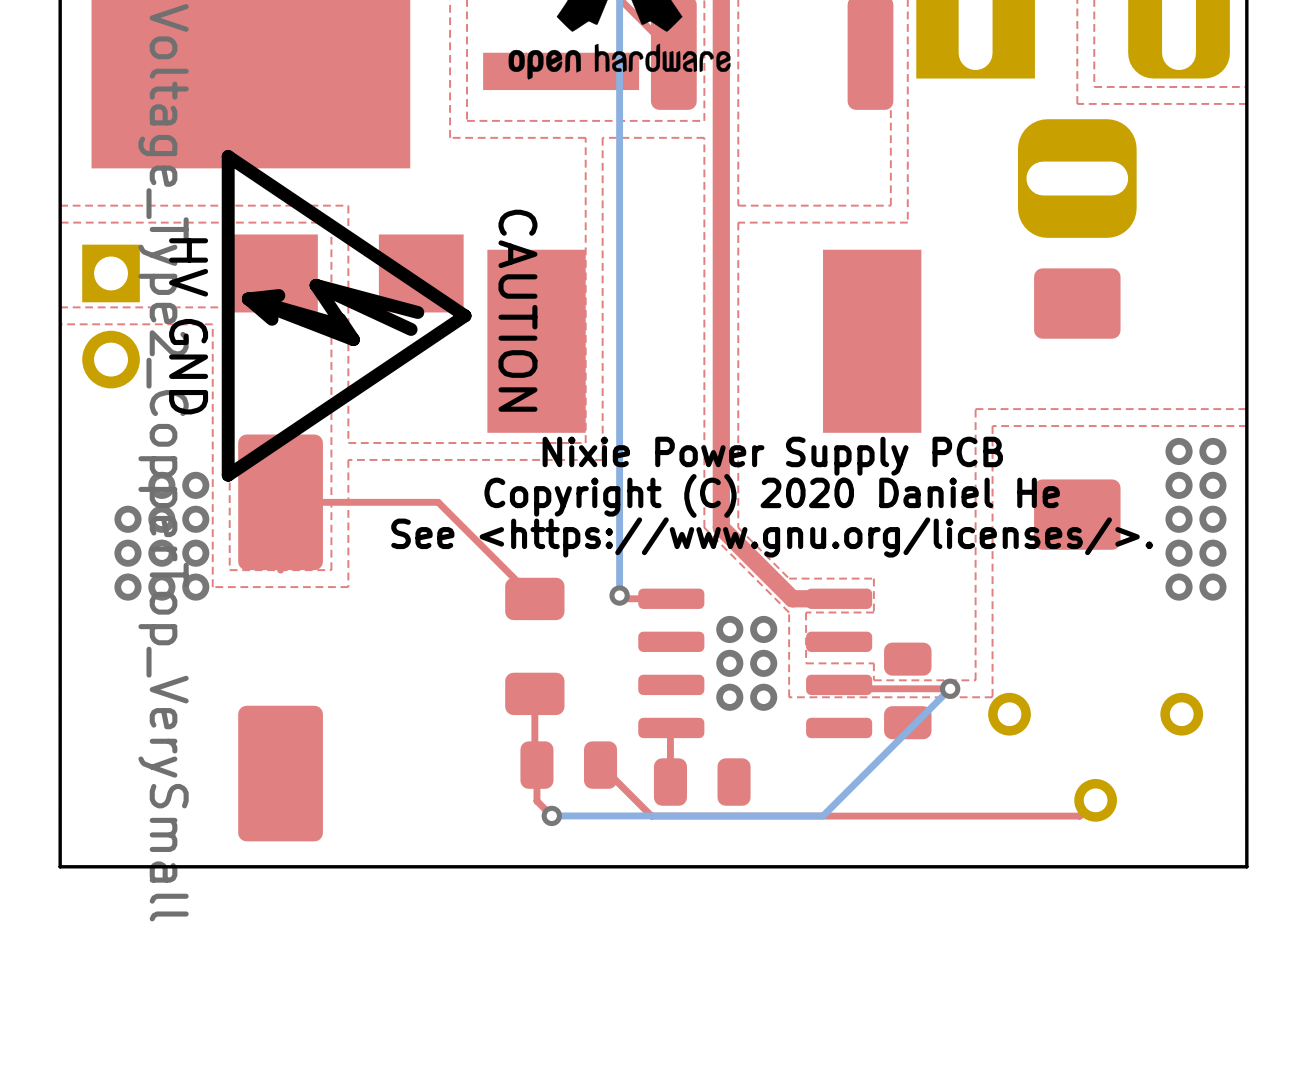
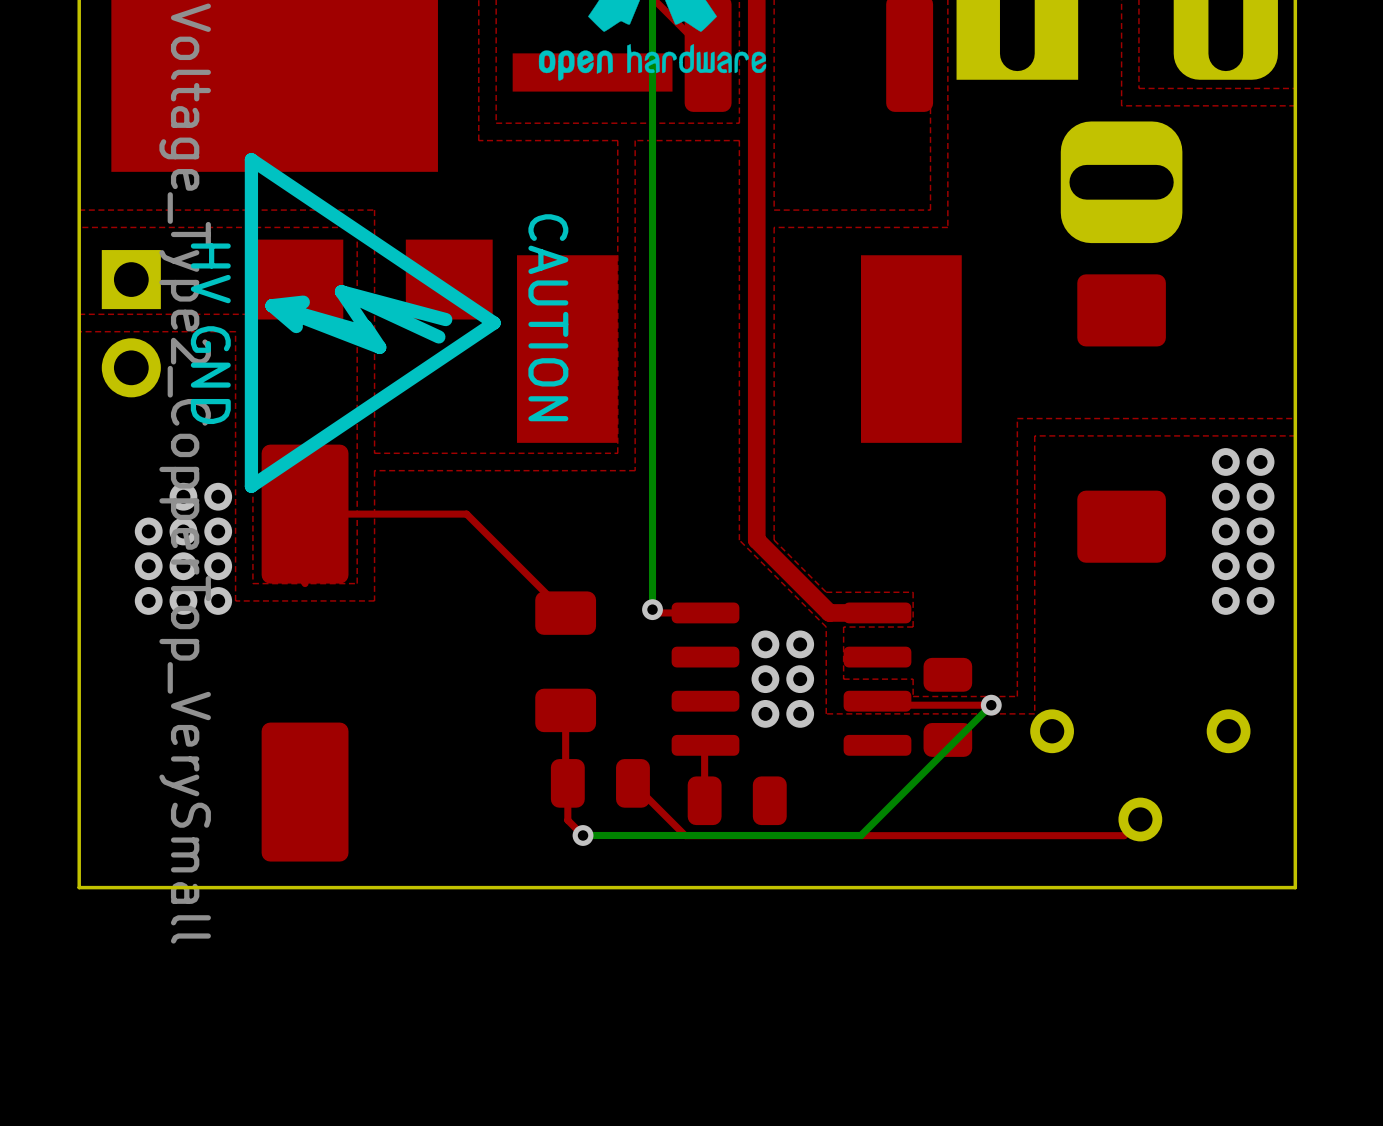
text: Nixie Power Supply PCB (772, 456) -> none
text: Copyright (C) 2020 Daniel He (772, 495) -> none
text: See <https://www.gnu.org/licenses/>. (772, 537) -> none

